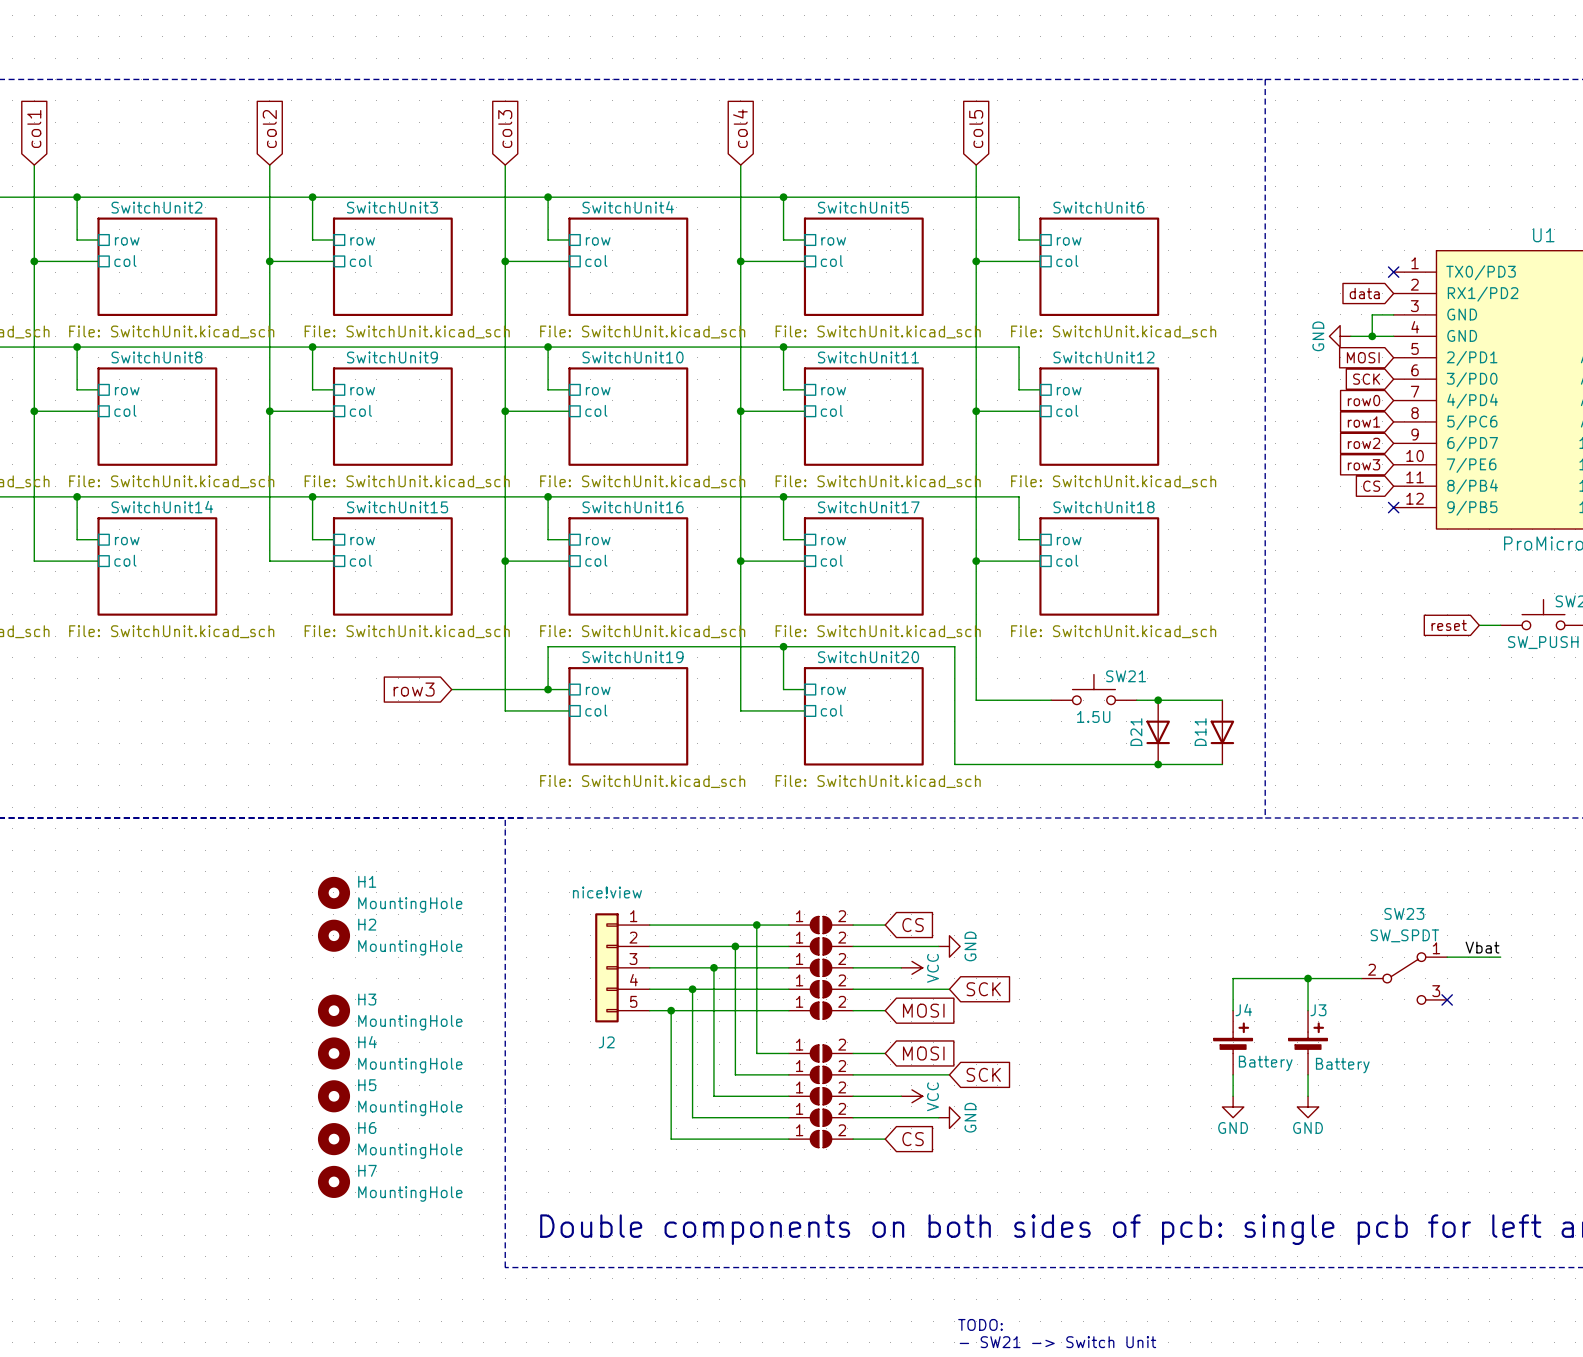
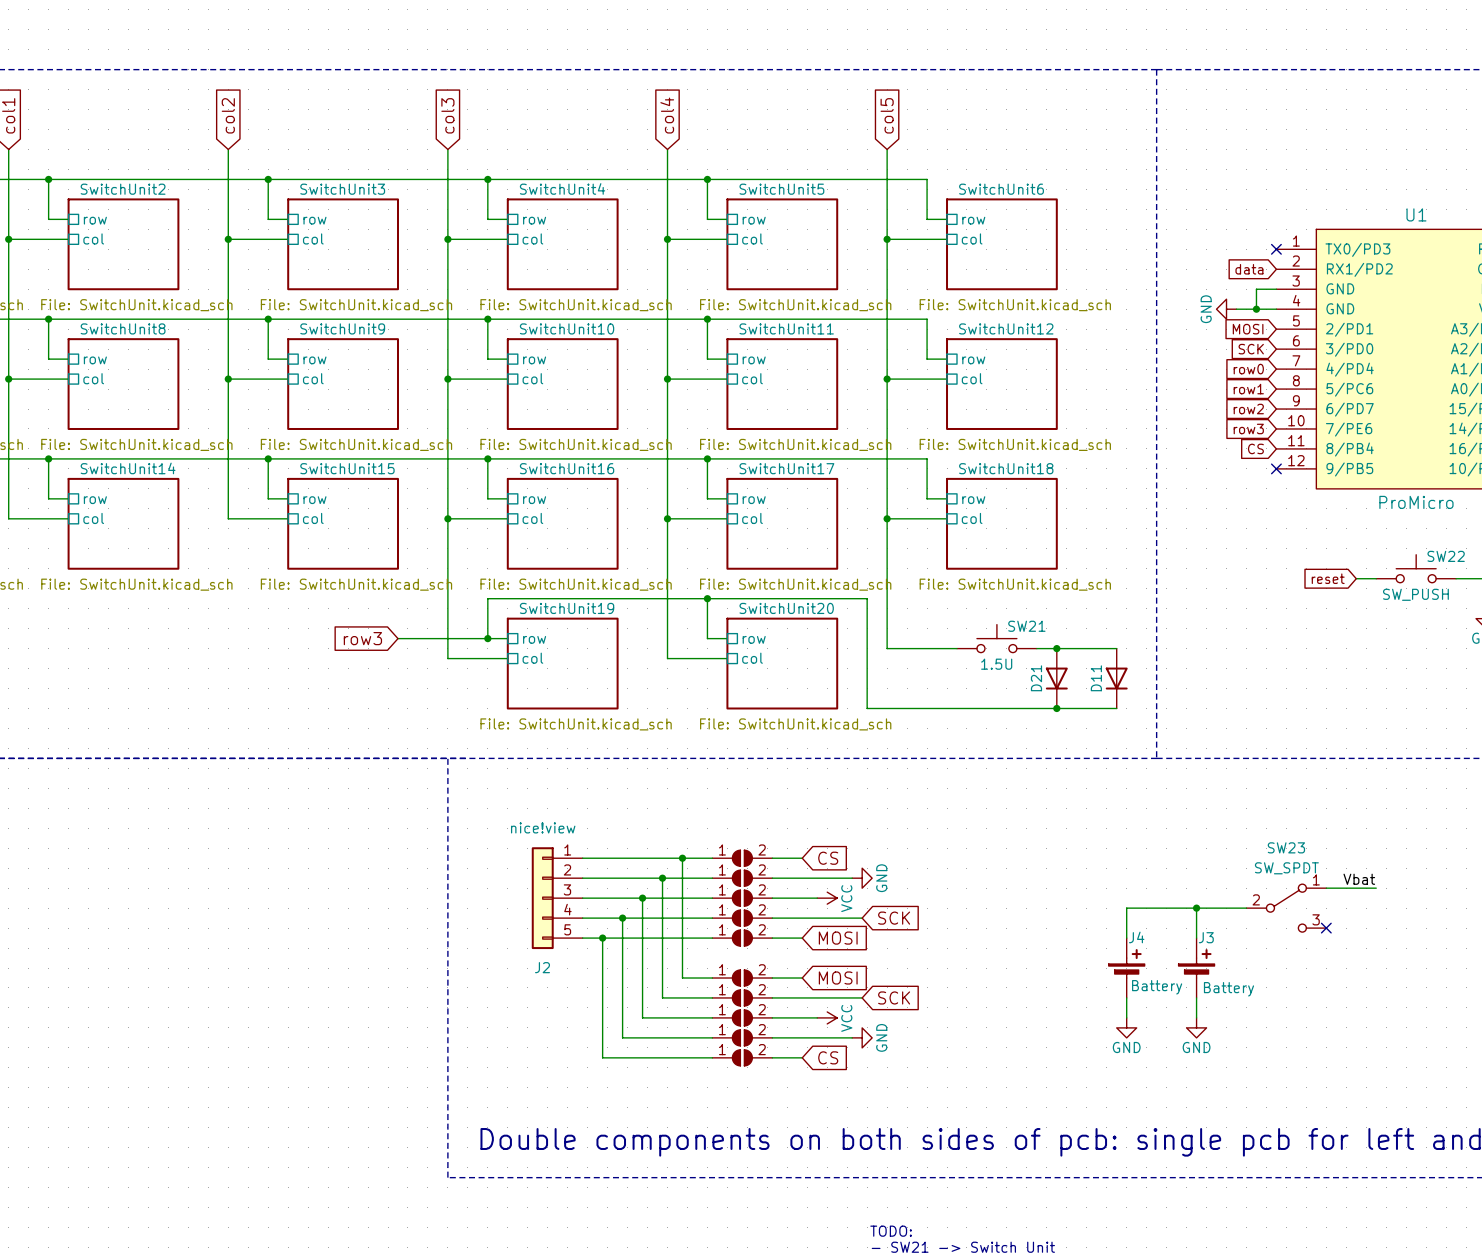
H1: MountingHole (333, 892) -> none
H2: MountingHole (333, 935) -> none
H3: MountingHole (333, 1010) -> none
H4: MountingHole (333, 1053) -> none
H5: MountingHole (333, 1096) -> none
H6: MountingHole (333, 1139) -> none
H7: MountingHole (333, 1181) -> none

